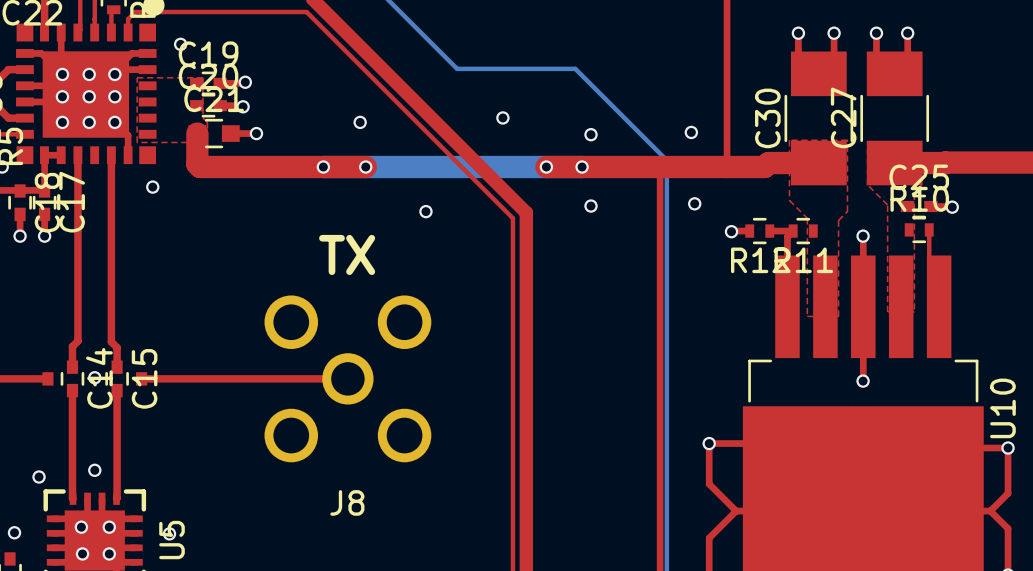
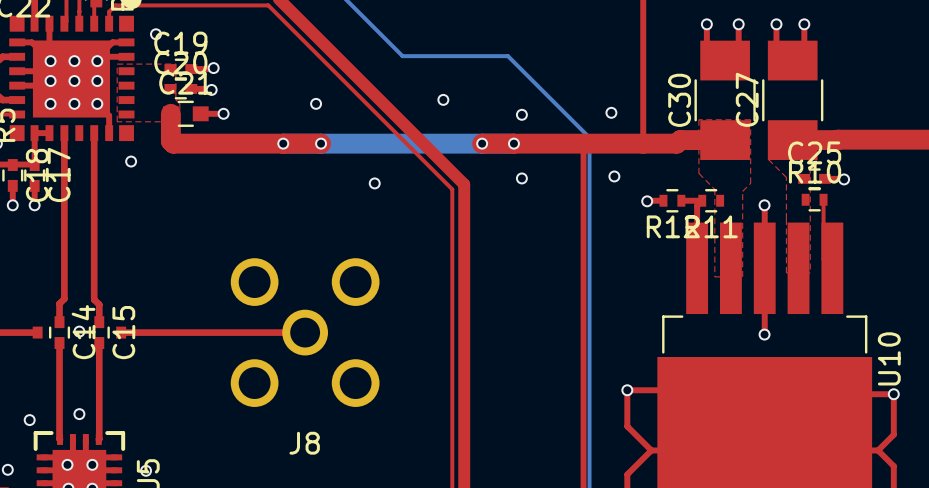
text: TX (347, 254) -> none

